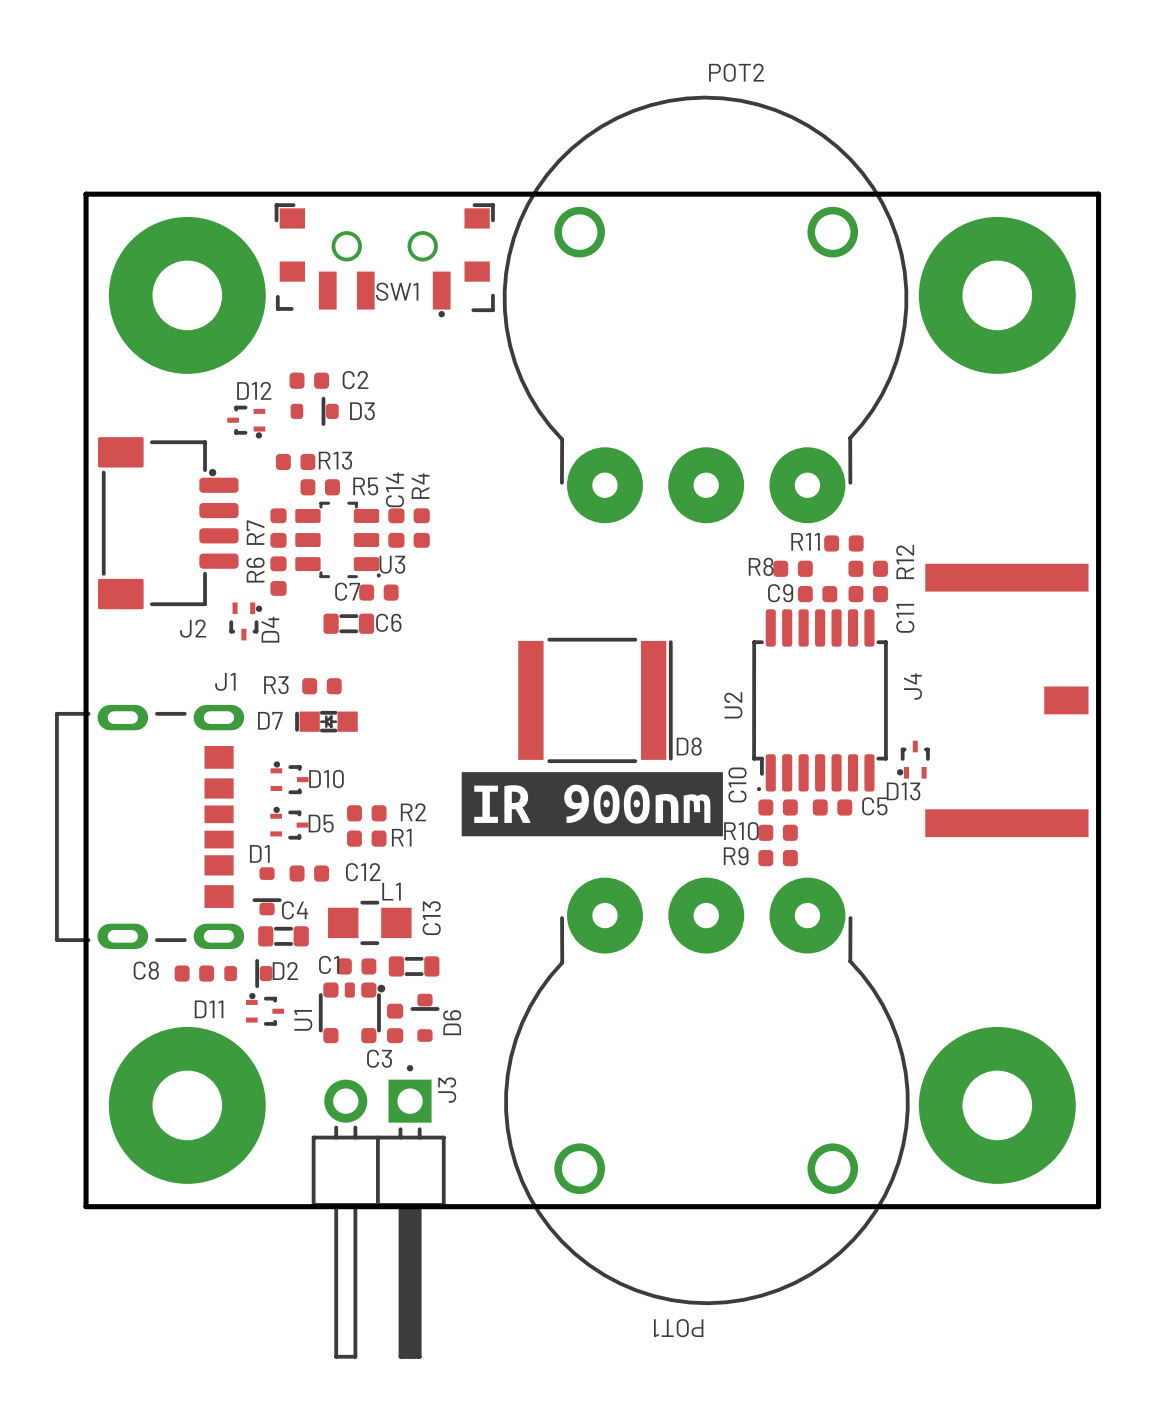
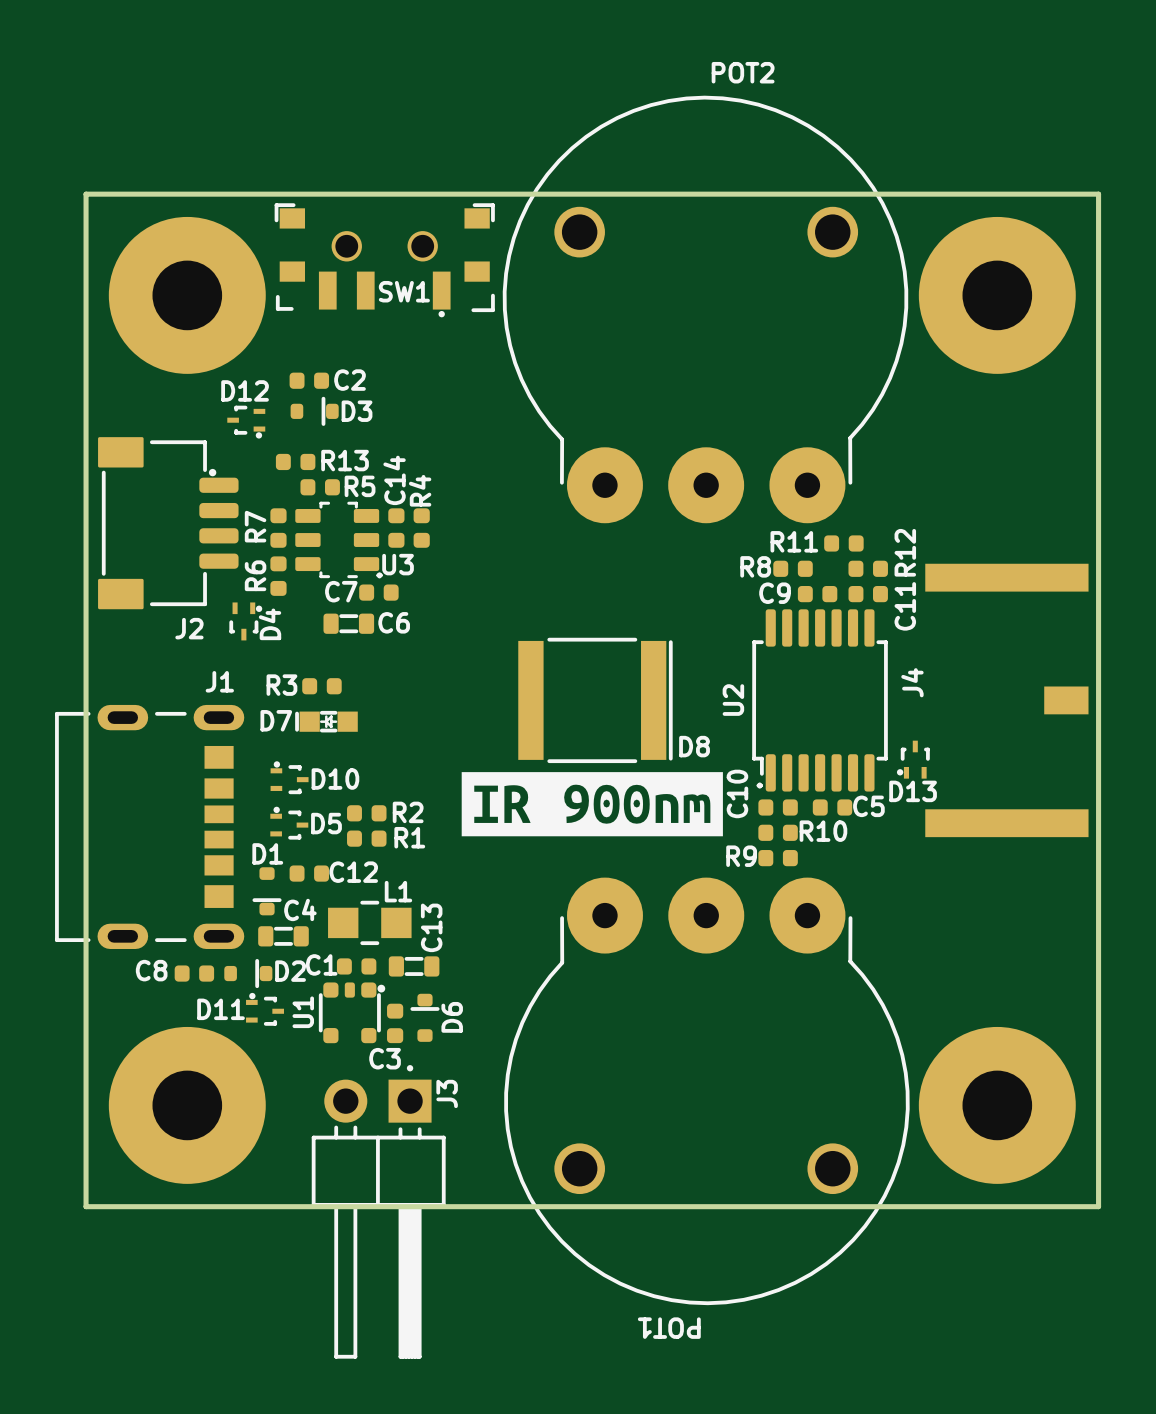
R10 name position: R10 (741, 831) -> R10 (823, 831)

